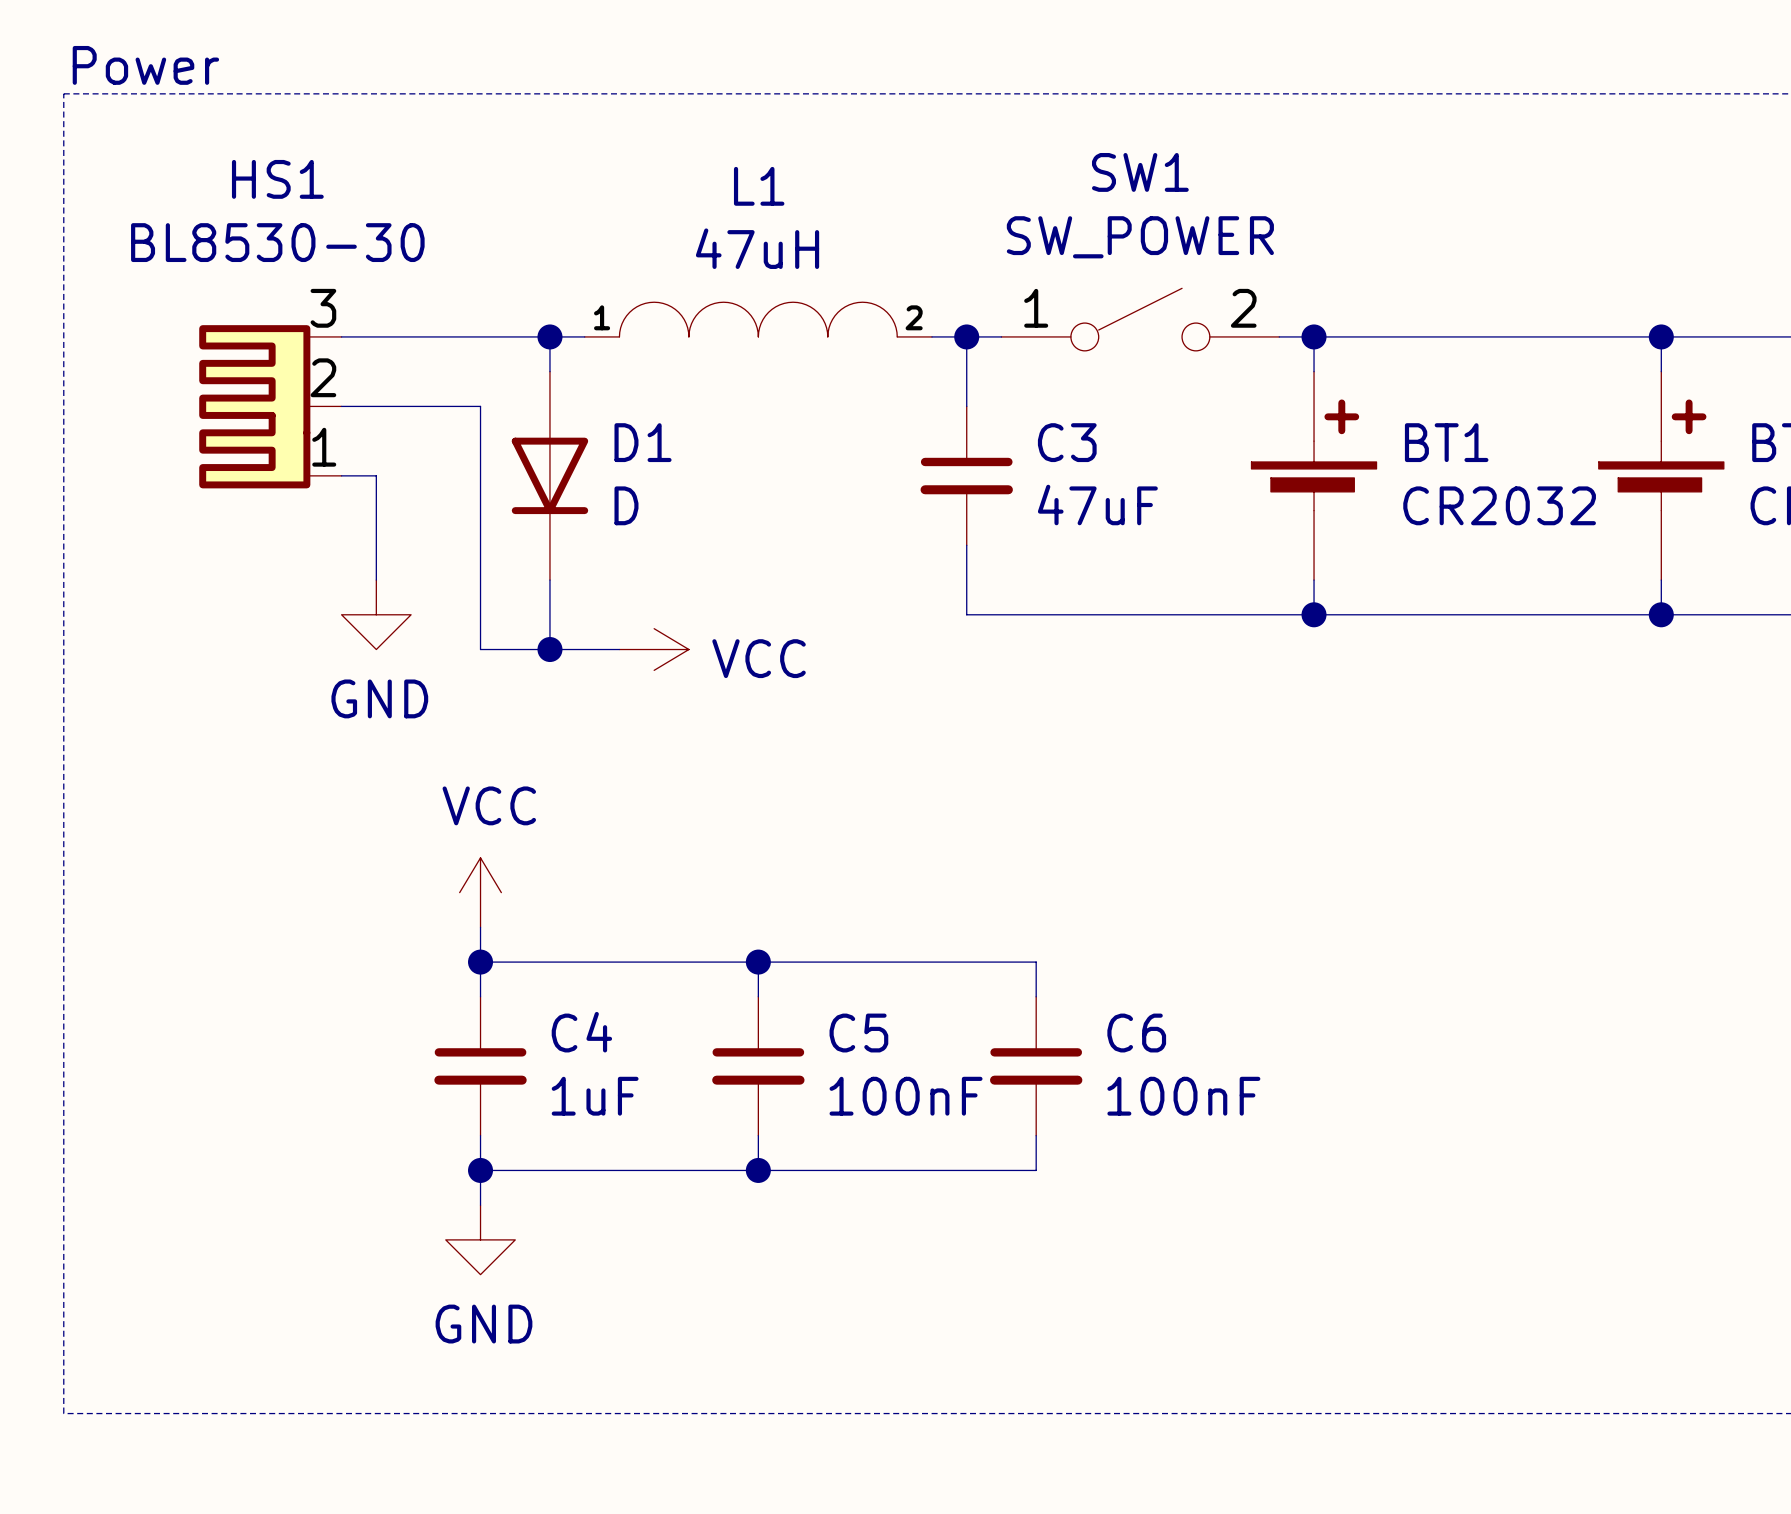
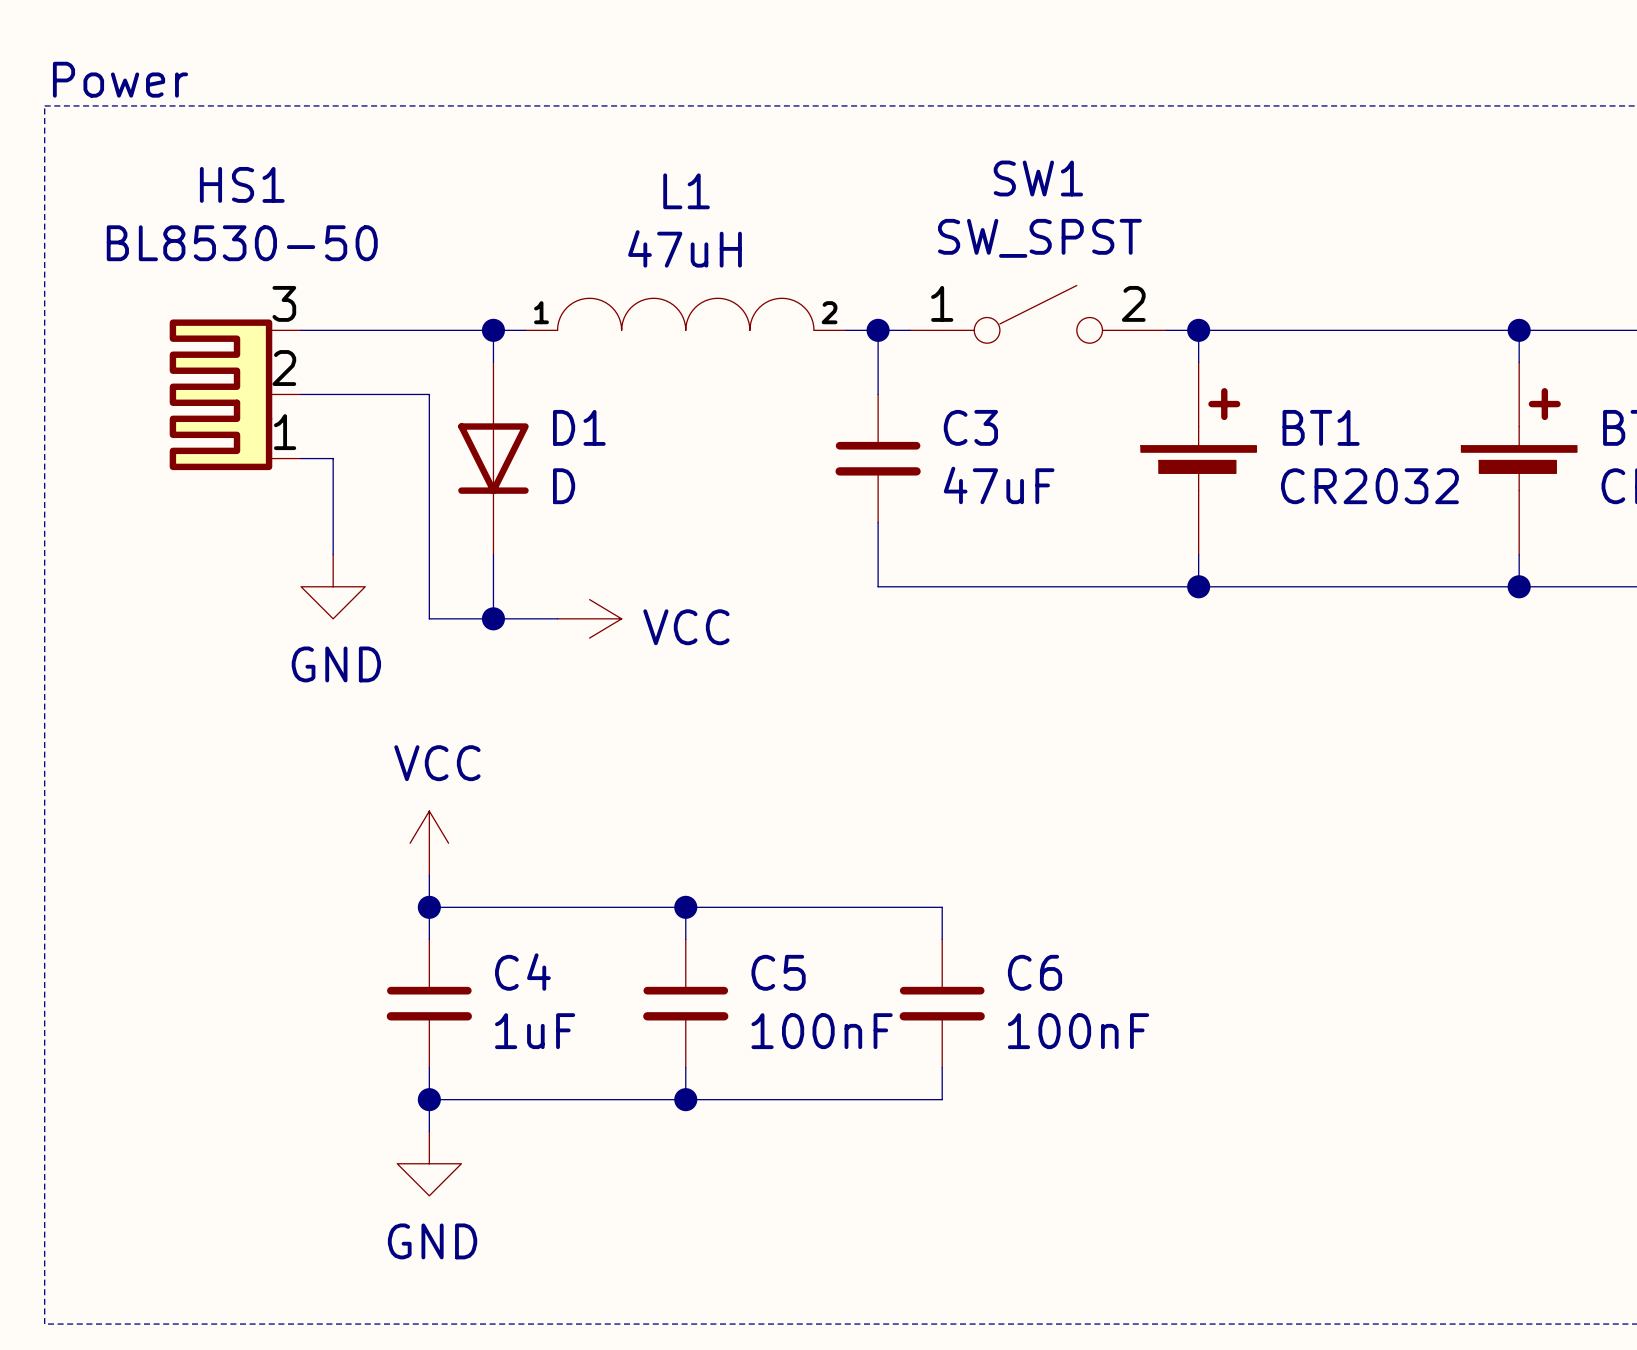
SW1 value: SW_POWER (1140, 237) -> SW_SPST (1039, 238)
HS1 value: BL8530-30 (277, 242) -> BL8530-50 (242, 243)

